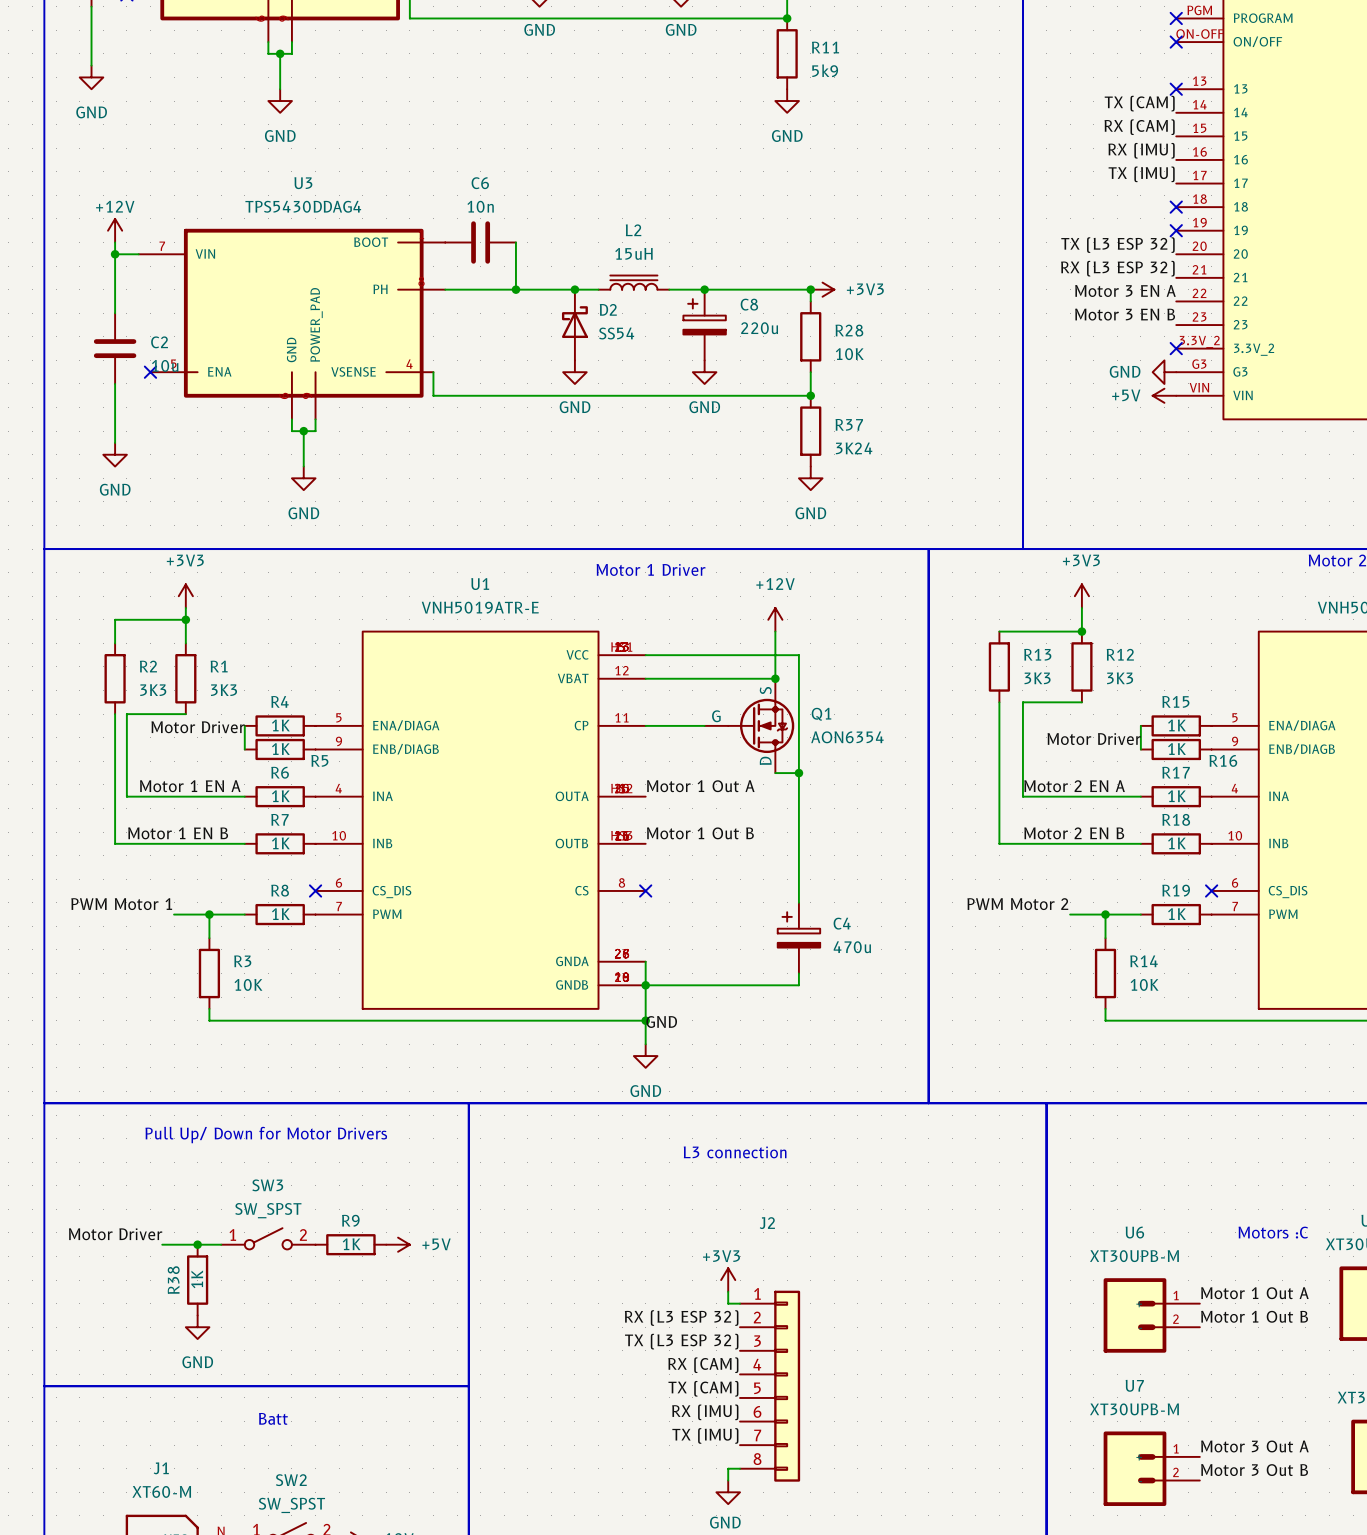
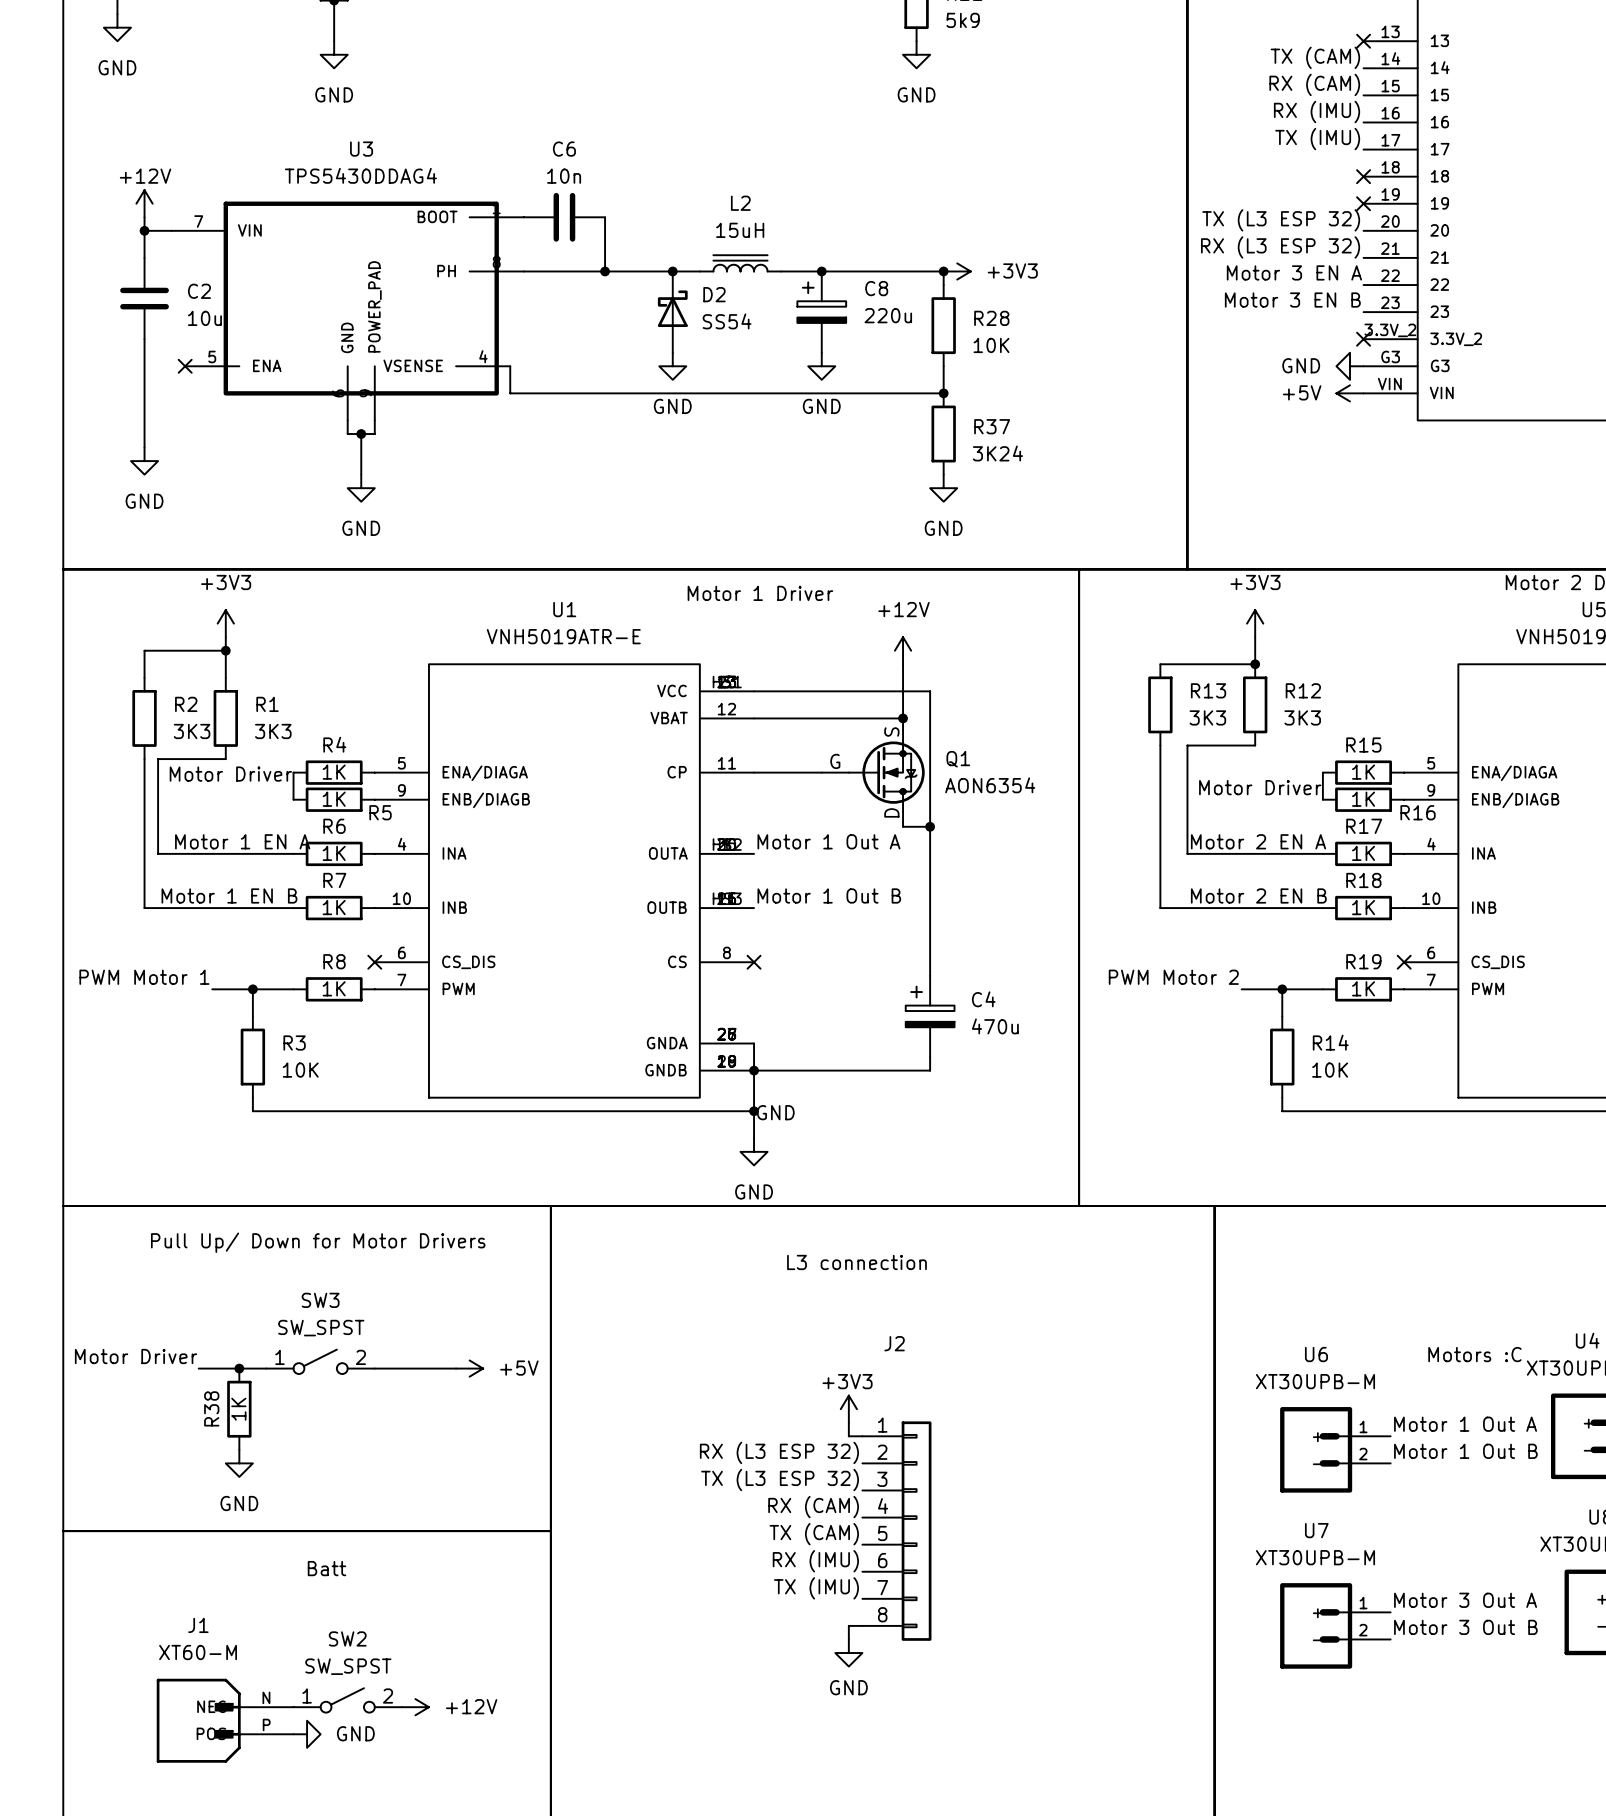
C2 position: (115, 348) -> (144, 298)
wire: none -> (374, 1368) (456, 1368)
R9: 1K (350, 1244) -> none

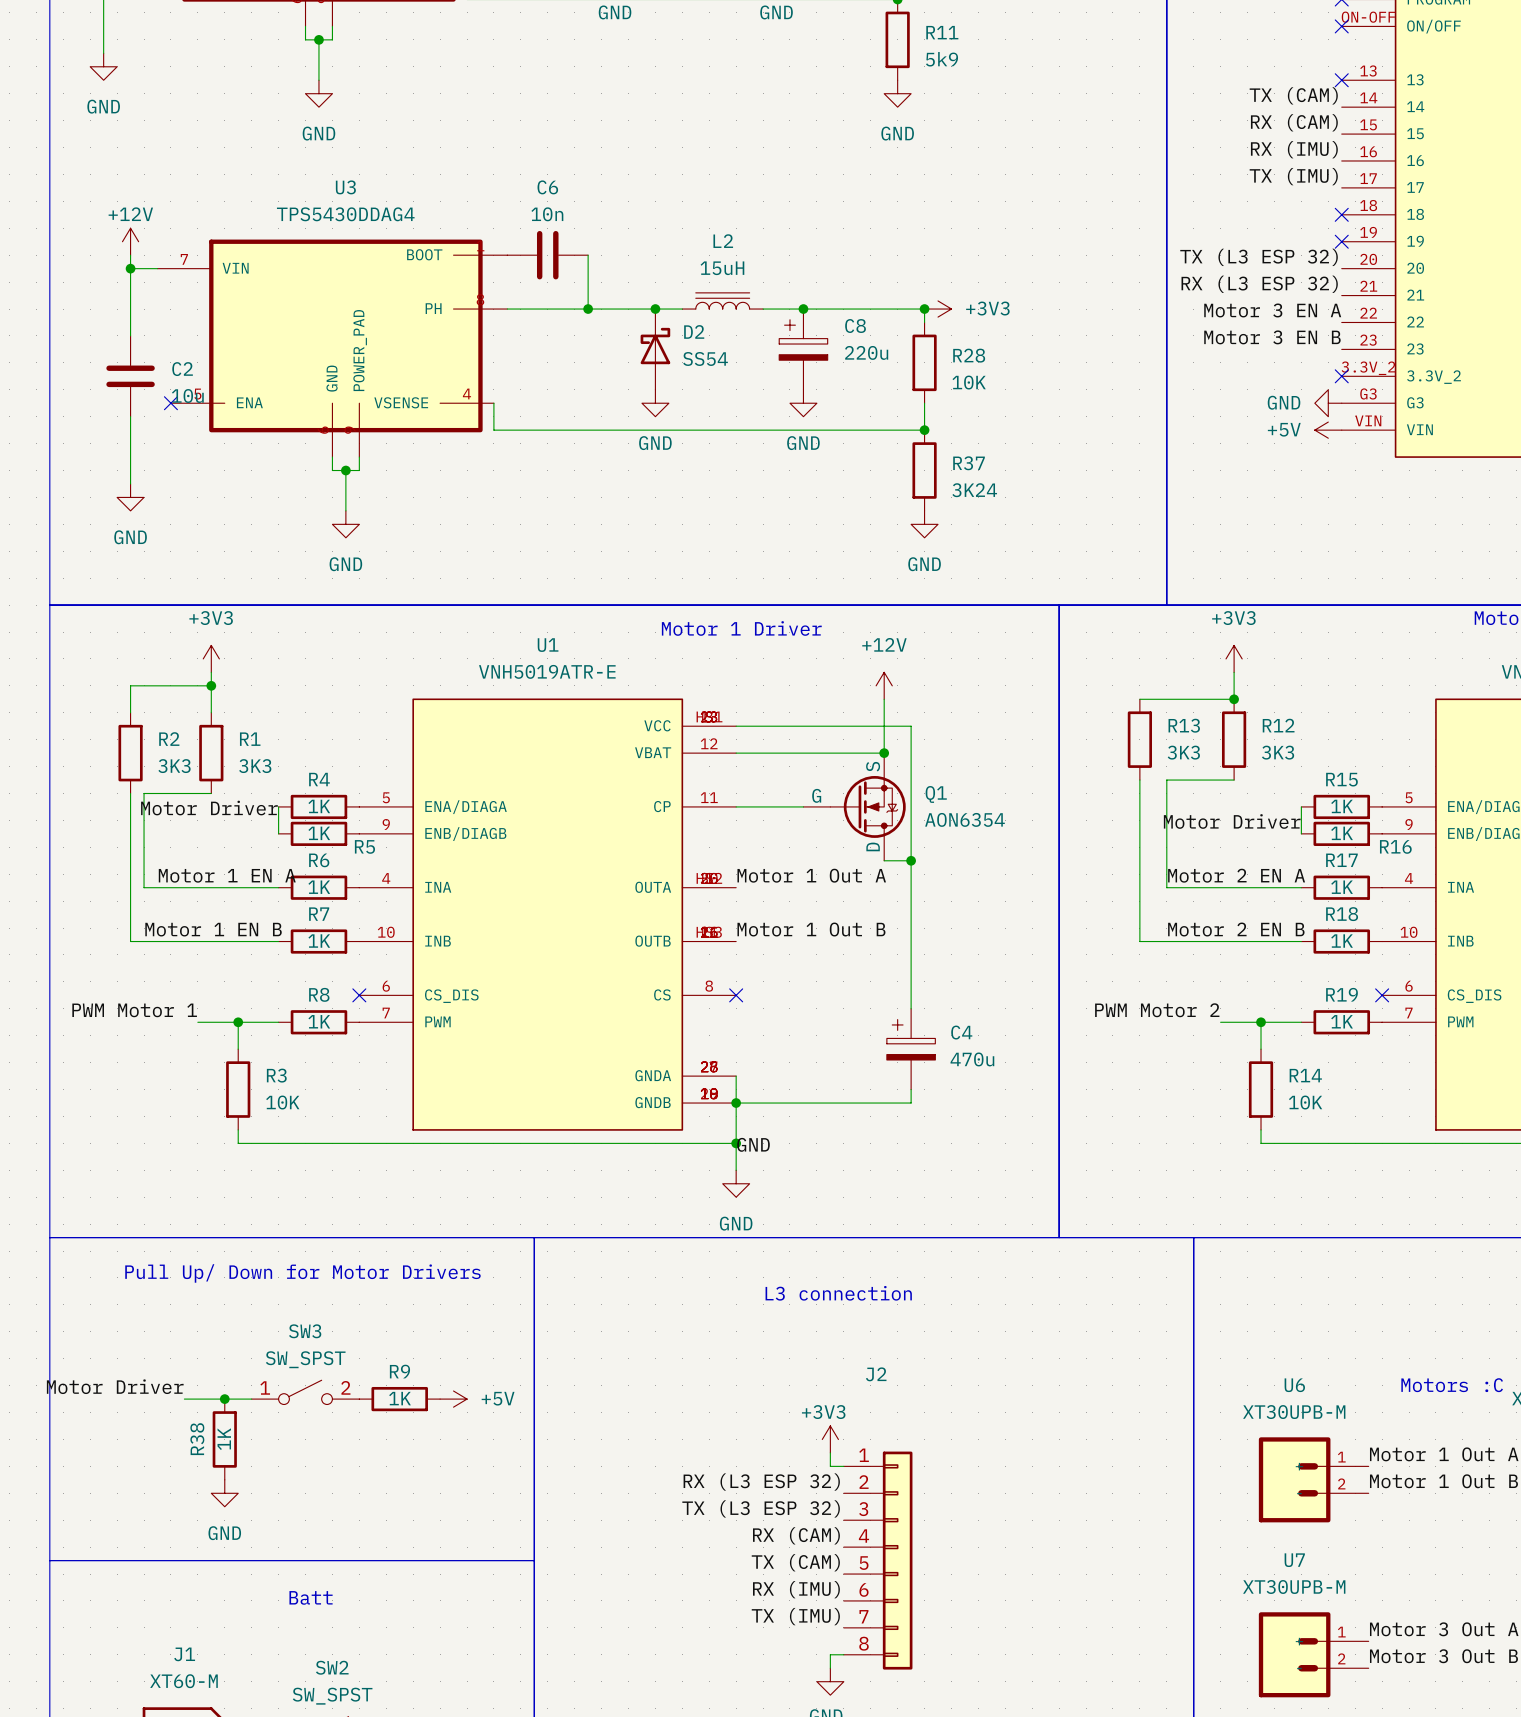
C2 position: (144, 298) -> (130, 376)
wire: (374, 1368) (456, 1368) -> none
R9: none -> 1K (399, 1399)

